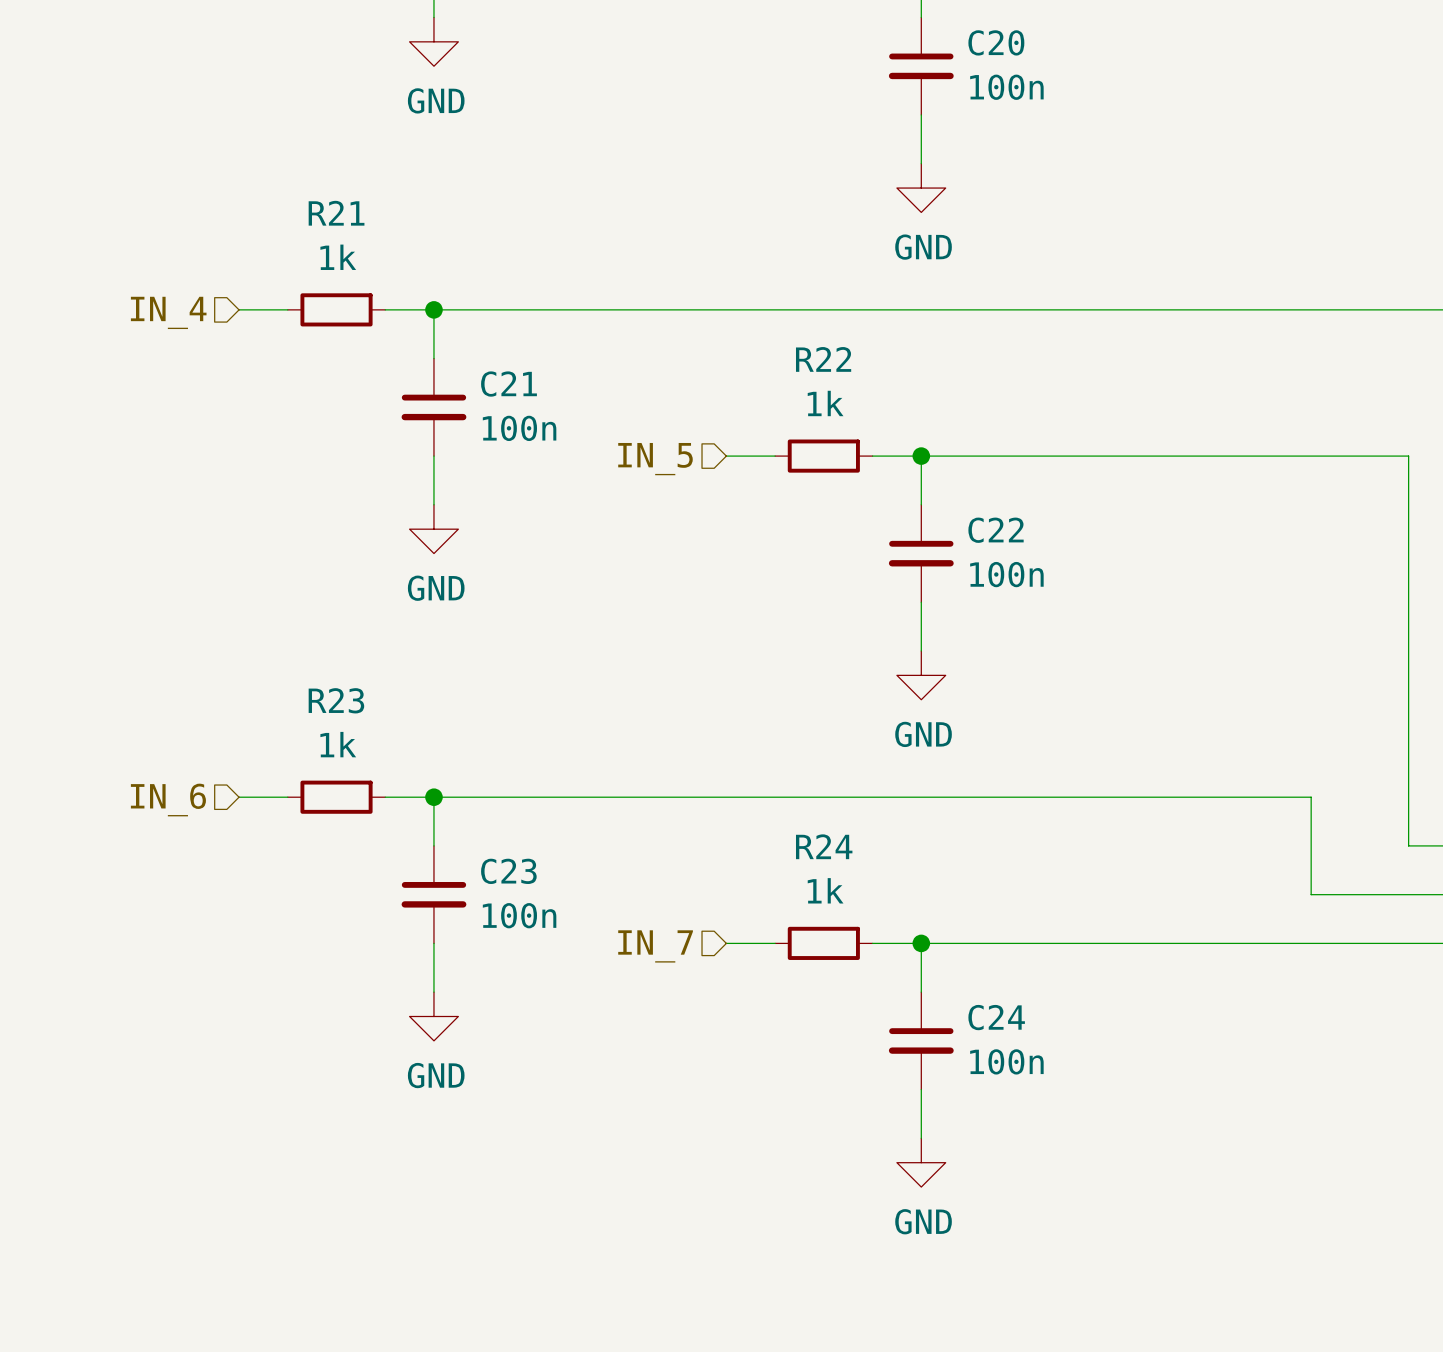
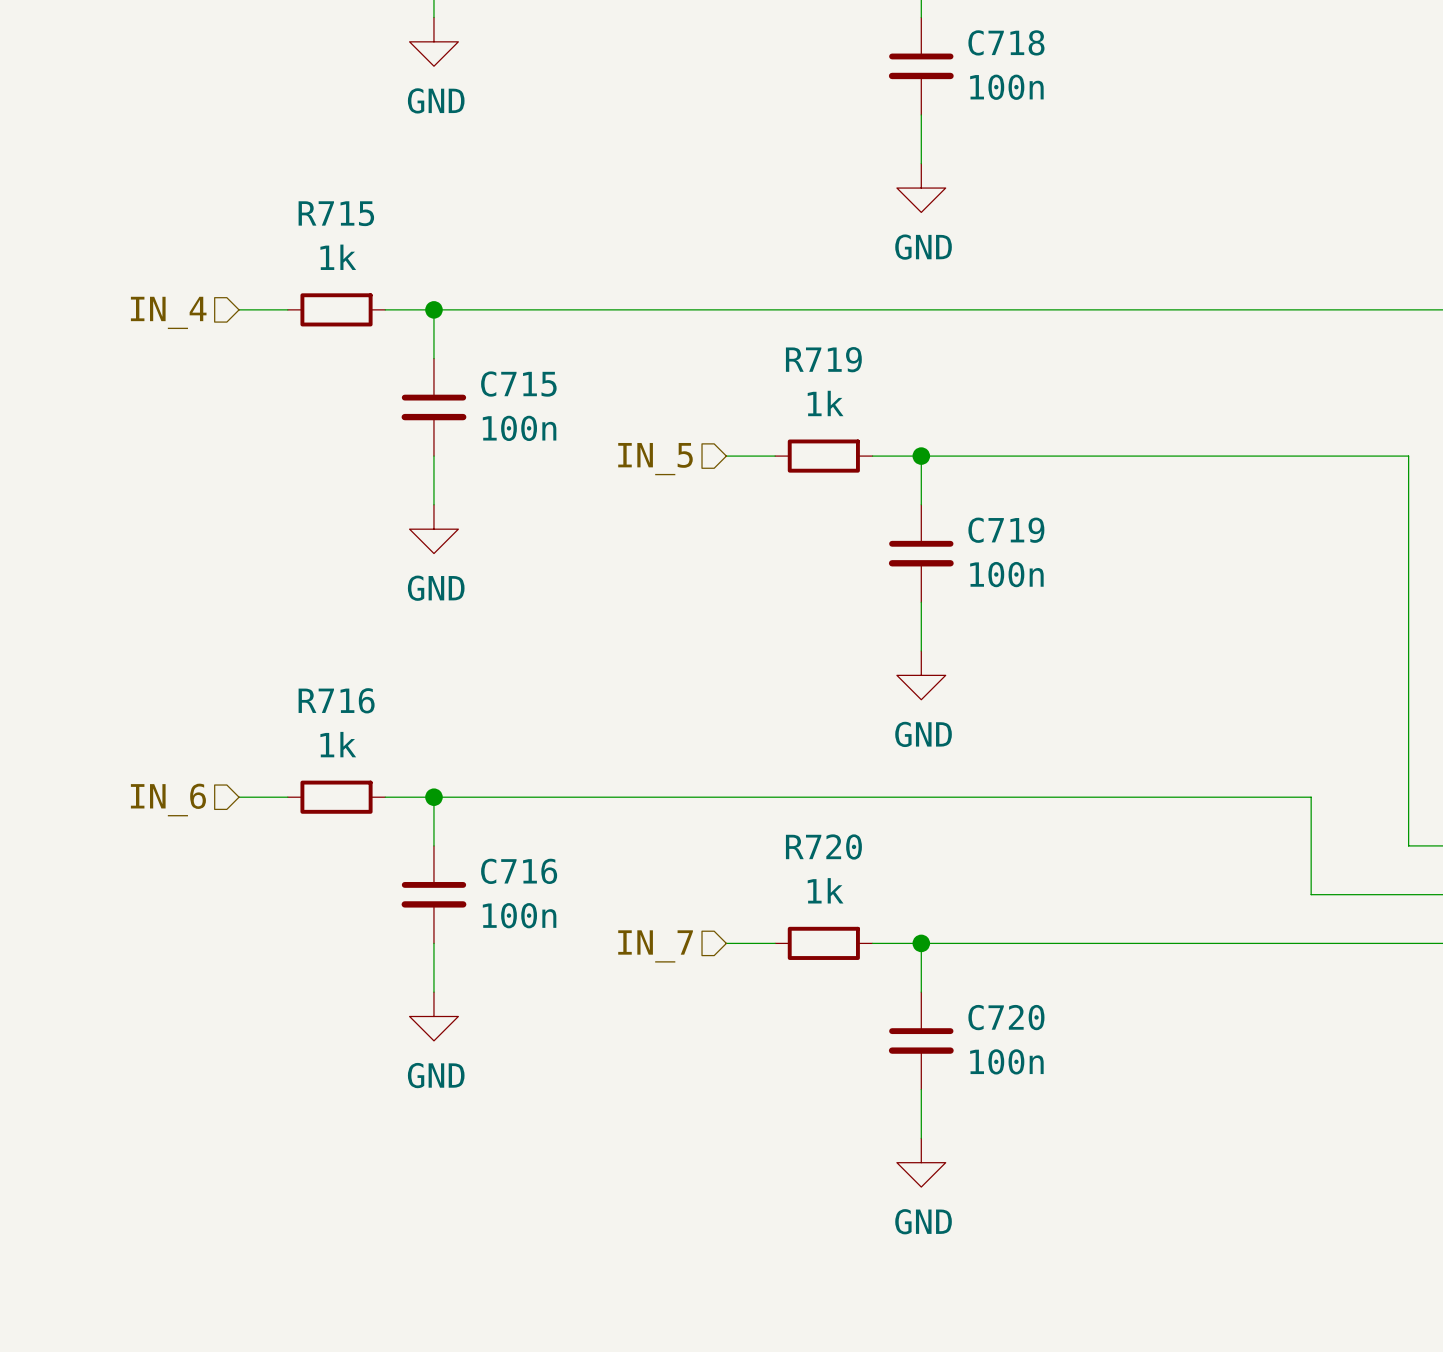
C20 name: C20 (996, 42) -> C718 (1006, 42)
R21 name: R21 (336, 213) -> R715 (336, 213)
R22 name: R22 (823, 359) -> R719 (823, 359)
C21 name: C21 (508, 384) -> C715 (518, 384)
C22 name: C22 (996, 530) -> C719 (1006, 530)
R23 name: R23 (336, 700) -> R716 (336, 700)
R24 name: R24 (824, 846) -> R720 (823, 846)
C23 name: C23 (508, 871) -> C716 (519, 871)
C24 name: C24 (996, 1017) -> C720 (1006, 1017)

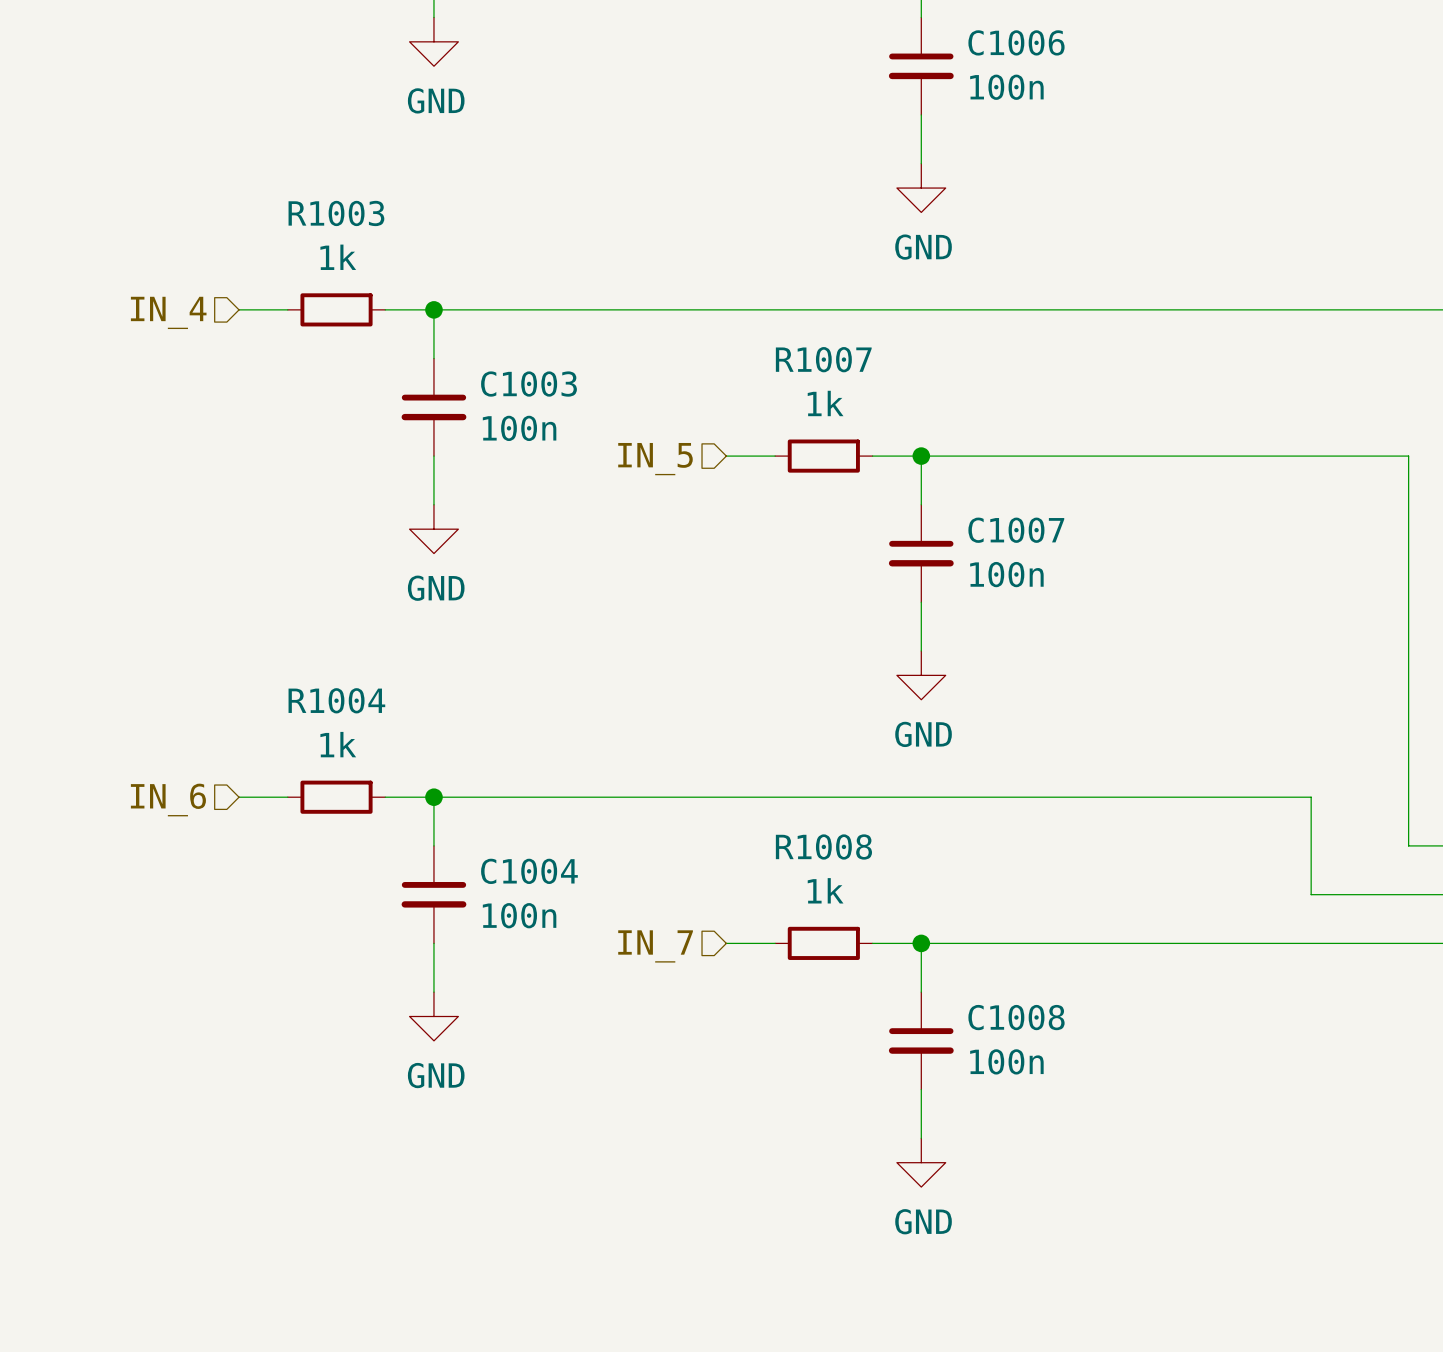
C718 name: C718 (1006, 42) -> C1006 (1016, 42)
R715 name: R715 (336, 213) -> R1003 (336, 213)
R719 name: R719 (823, 359) -> R1007 (823, 359)
C715 name: C715 (518, 384) -> C1003 (528, 384)
C719 name: C719 (1006, 530) -> C1007 (1016, 530)
R716 name: R716 (336, 700) -> R1004 (336, 700)
R720 name: R720 (823, 846) -> R1008 (823, 846)
C716 name: C716 (519, 871) -> C1004 (529, 871)
C720 name: C720 (1006, 1017) -> C1008 (1016, 1017)

